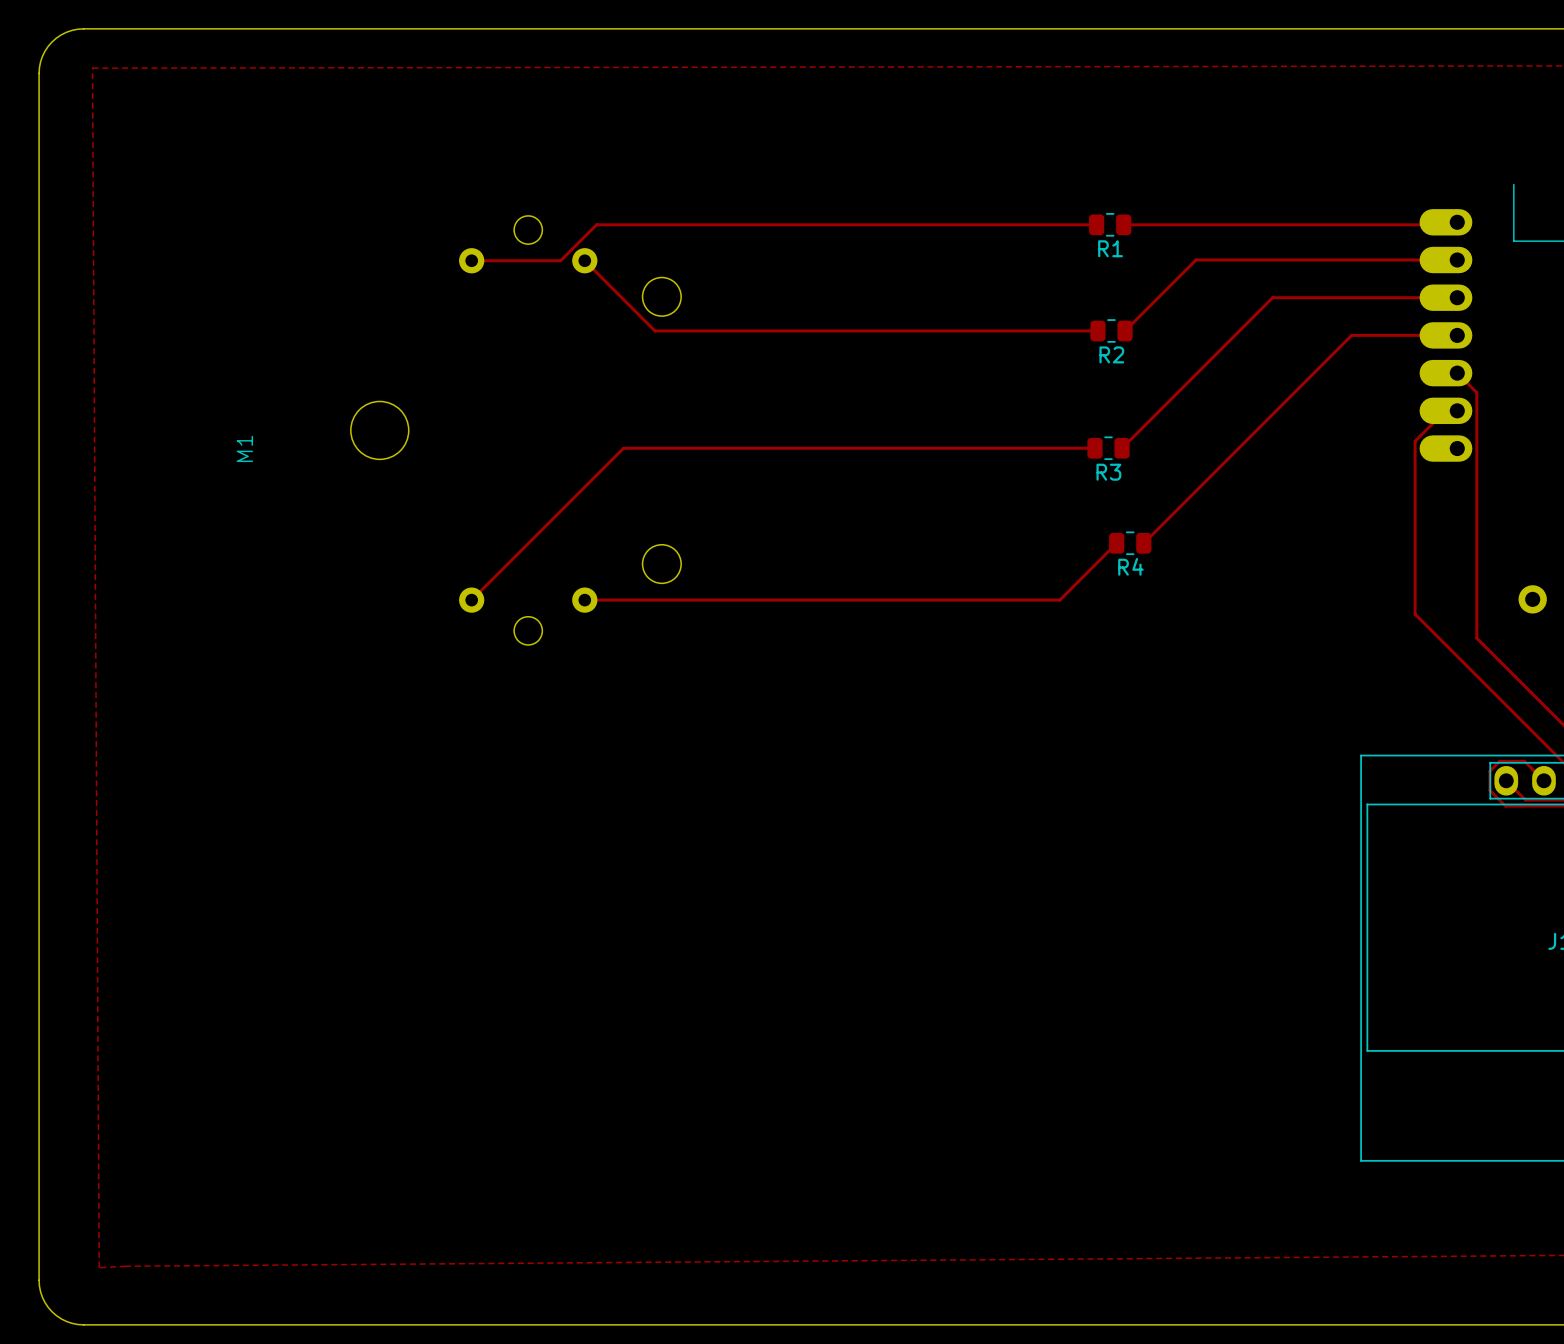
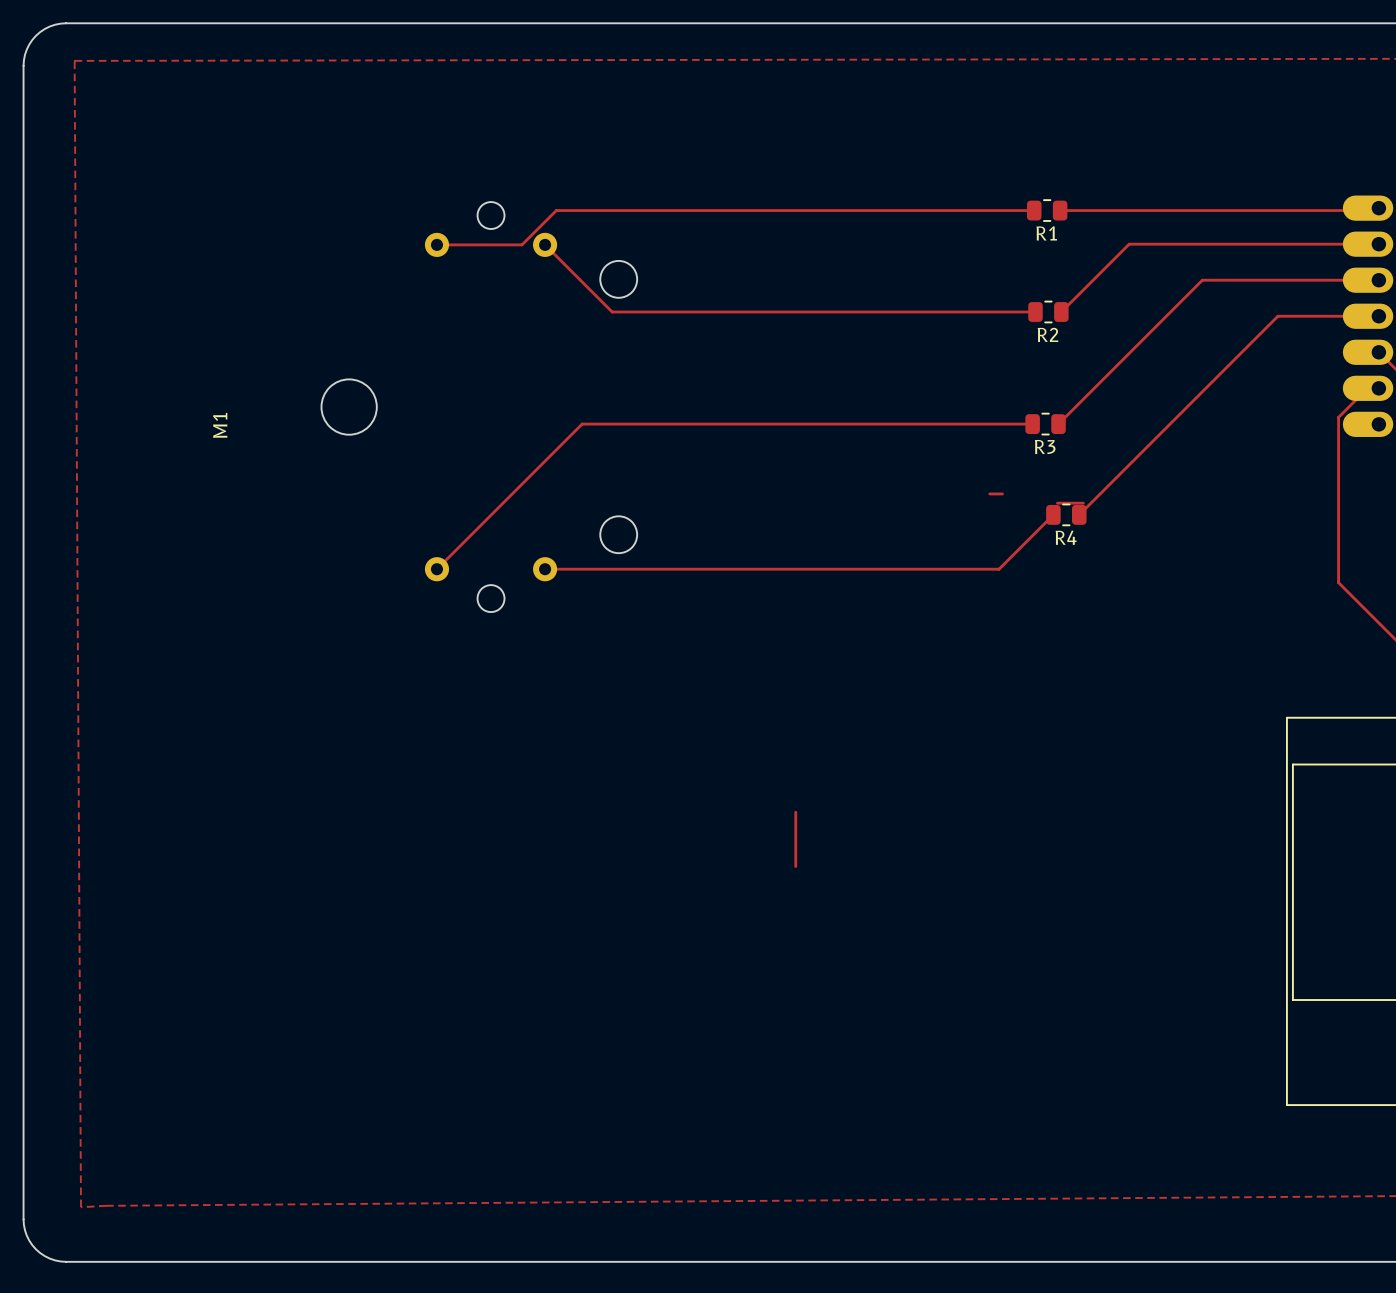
track: none -> (989, 493) (1002, 493)
track: none -> (1057, 503) (1083, 503)
track: none -> (795, 812) (795, 866)

